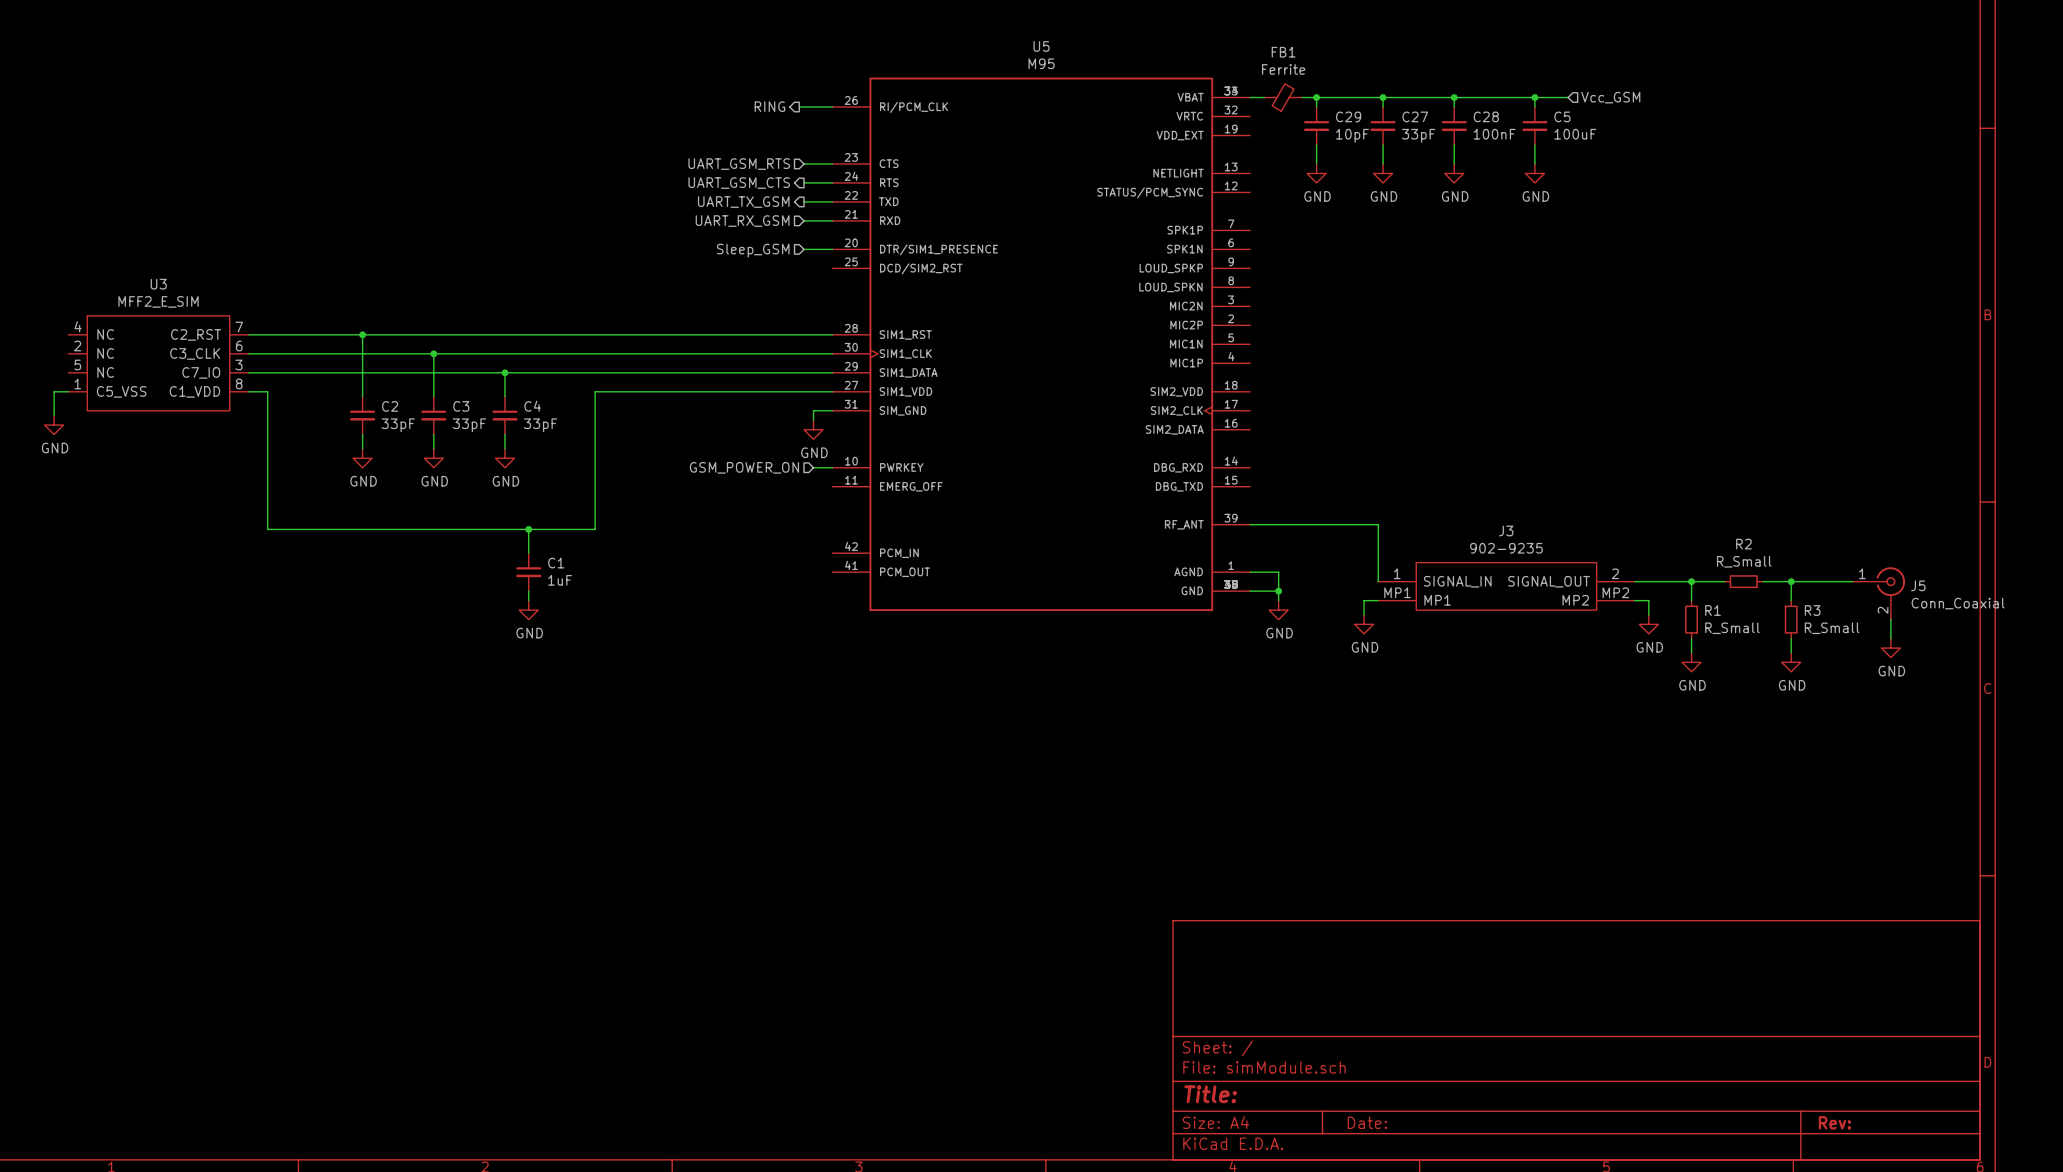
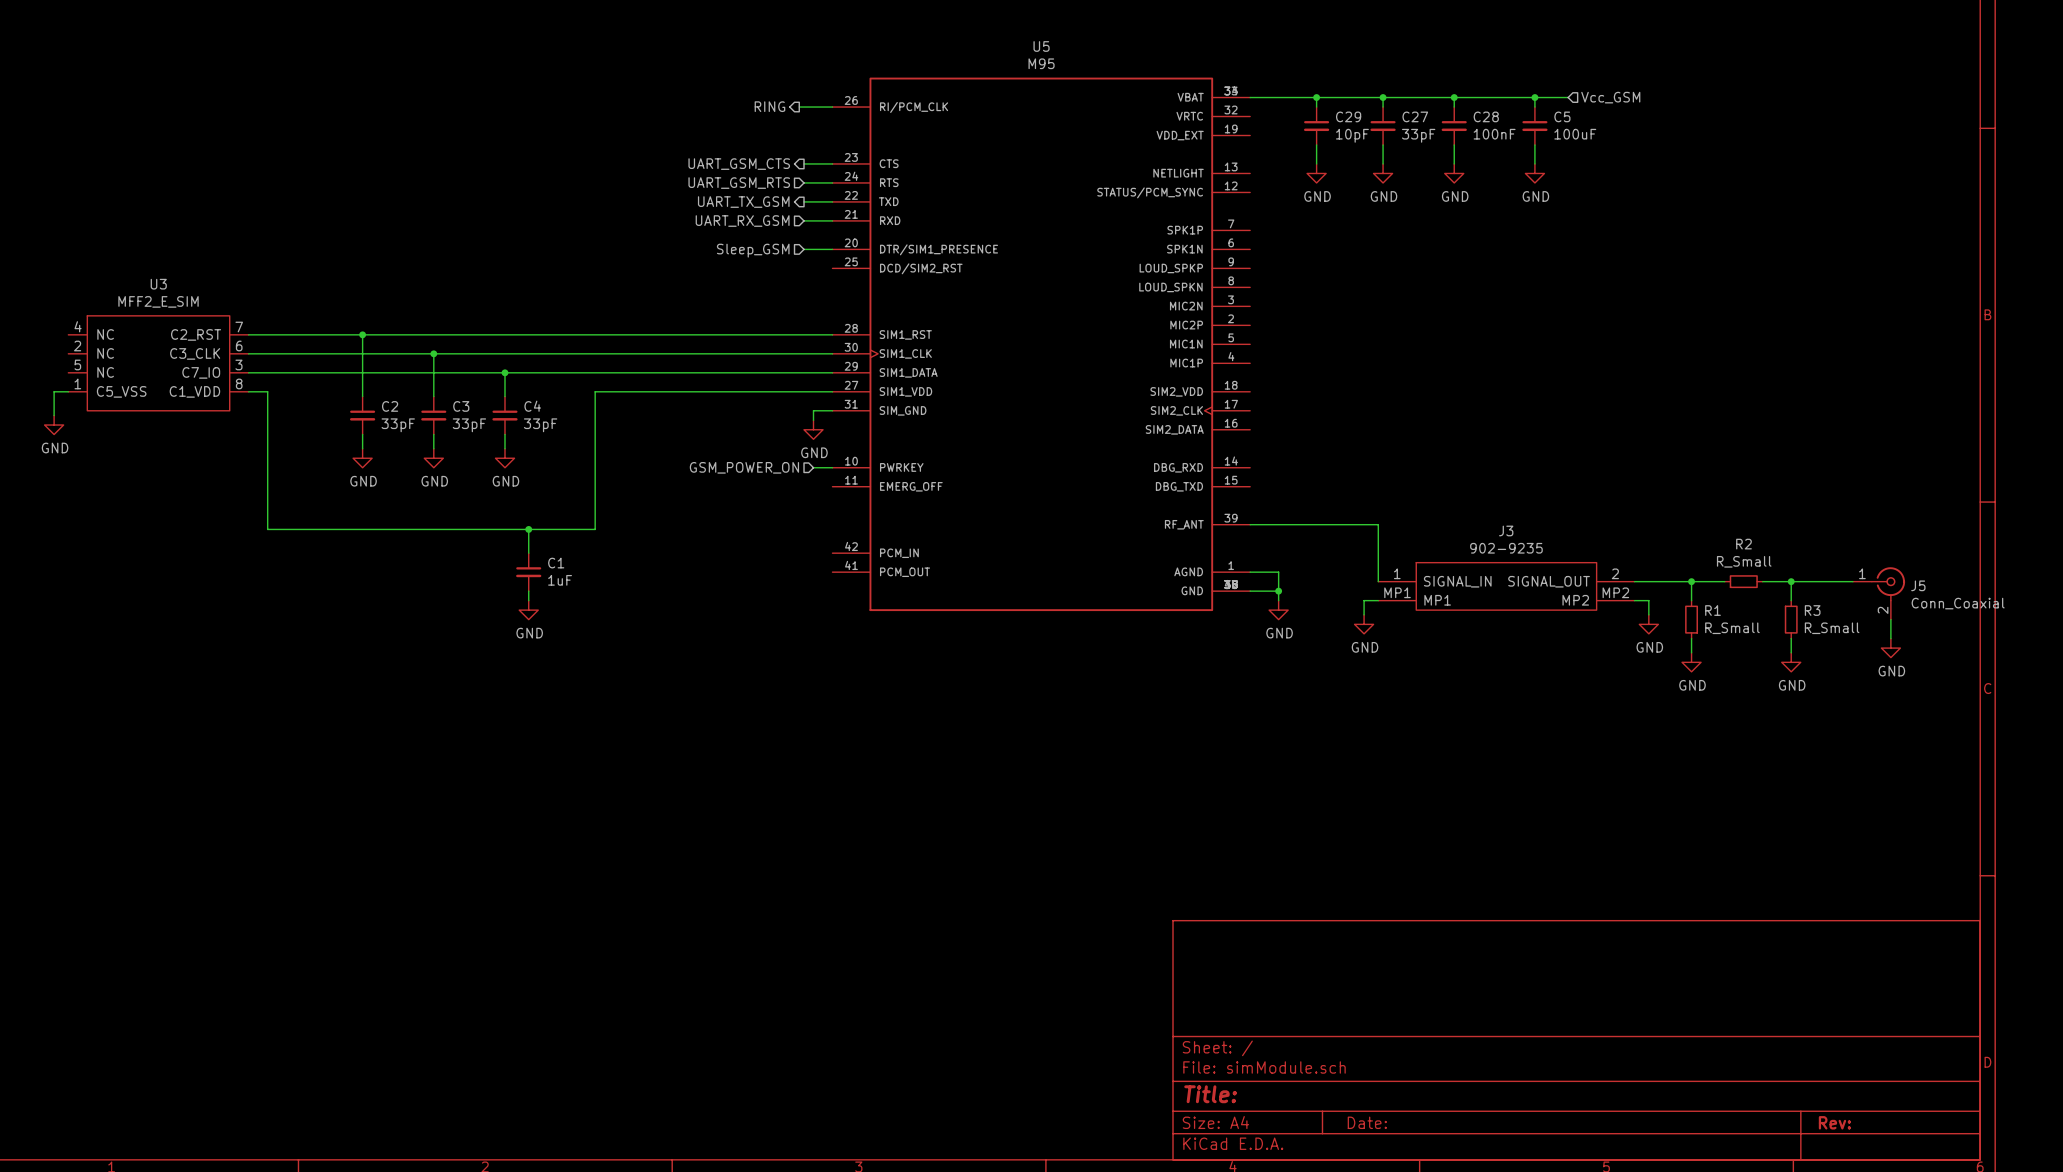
FB1: Ferrite (1283, 97) -> none
hierarchical label shape: input (739, 164) -> output (739, 164)
hierarchical label: UART_GSM_RTS (739, 164) -> UART_GSM_CTS (739, 164)
hierarchical label shape: output (739, 183) -> input (739, 183)
hierarchical label: UART_GSM_CTS (739, 183) -> UART_GSM_RTS (739, 183)

